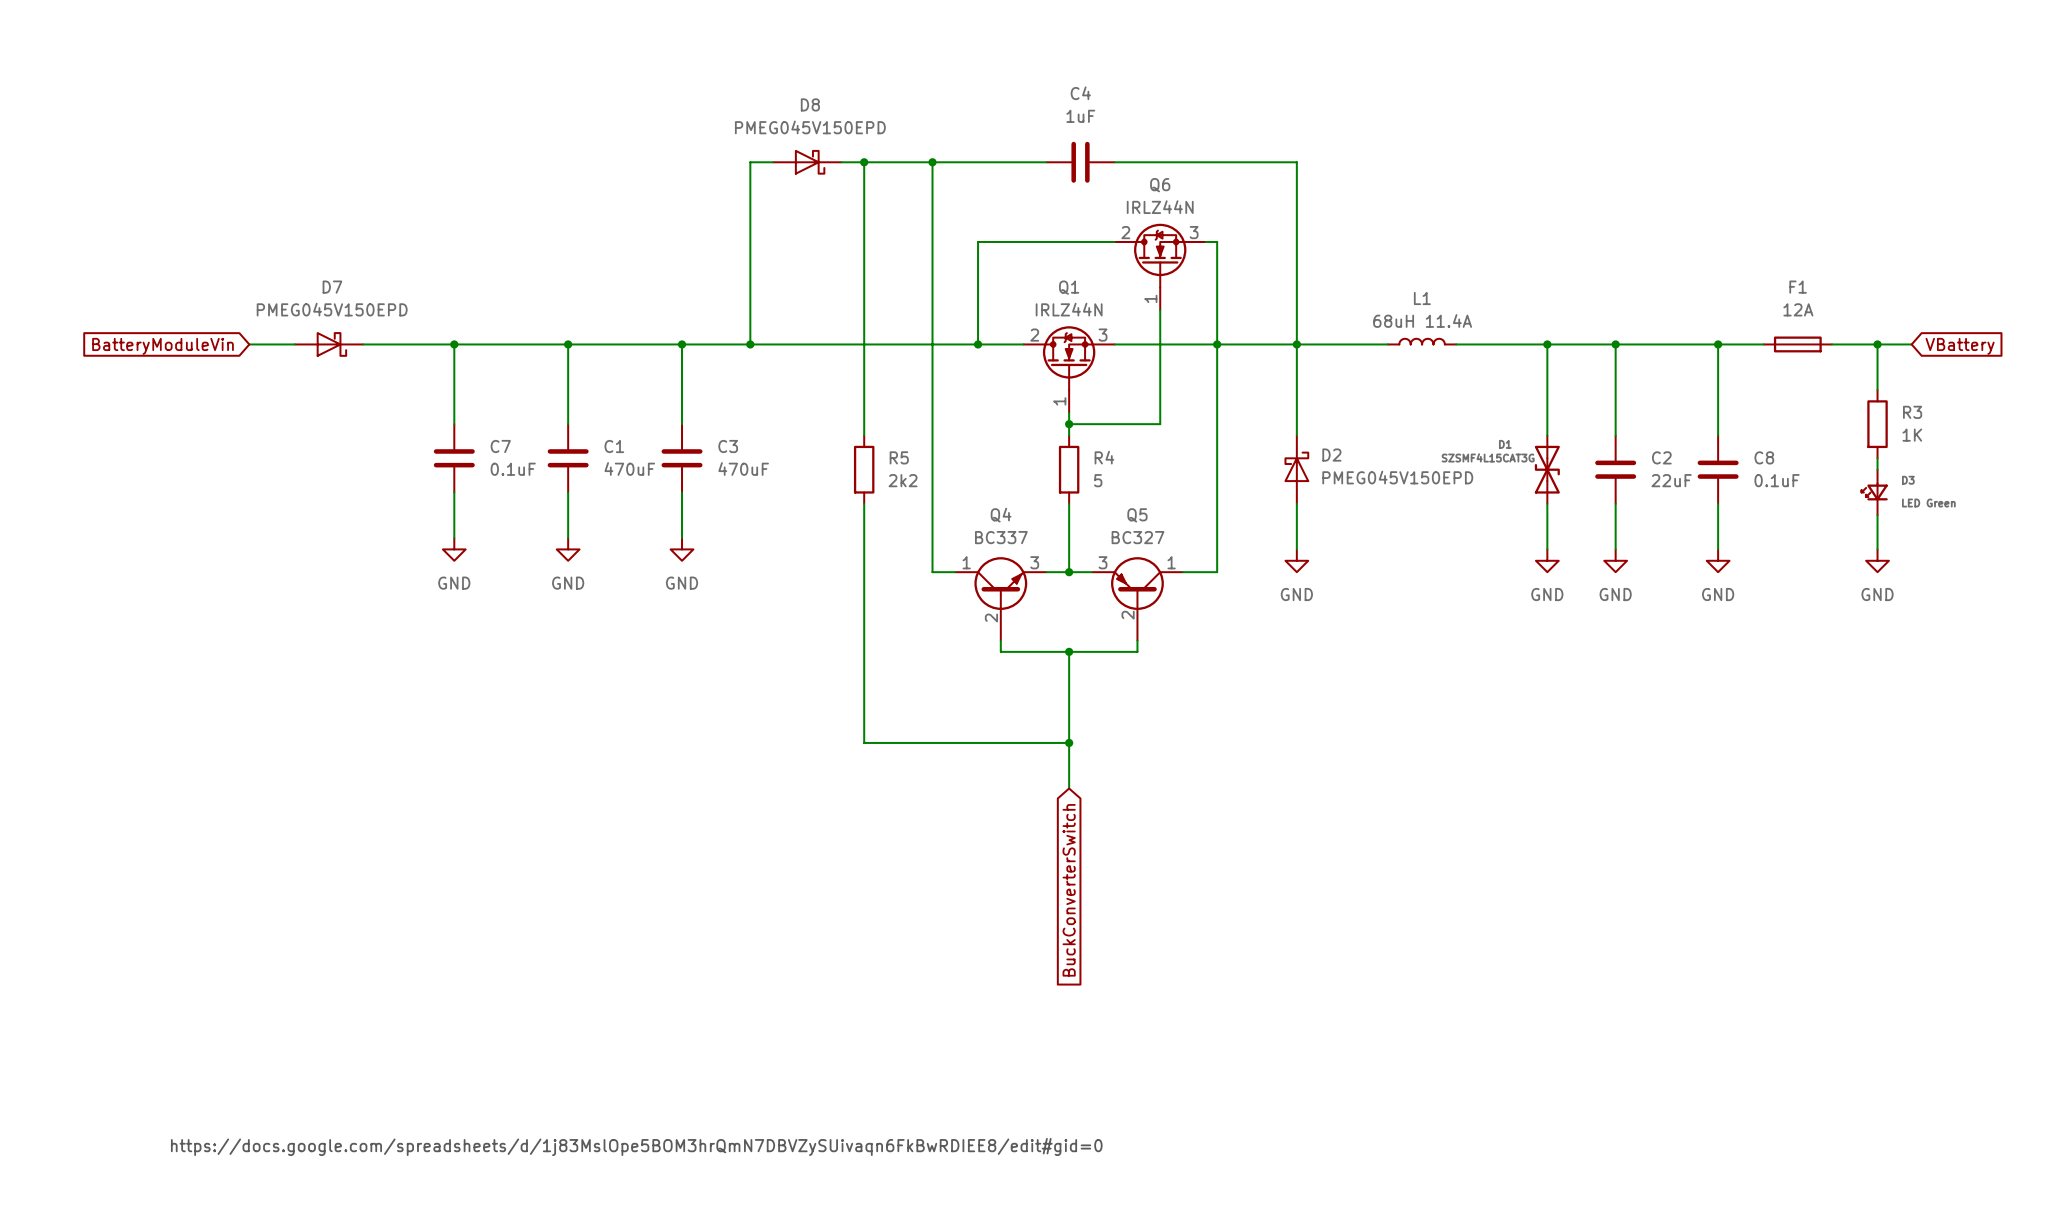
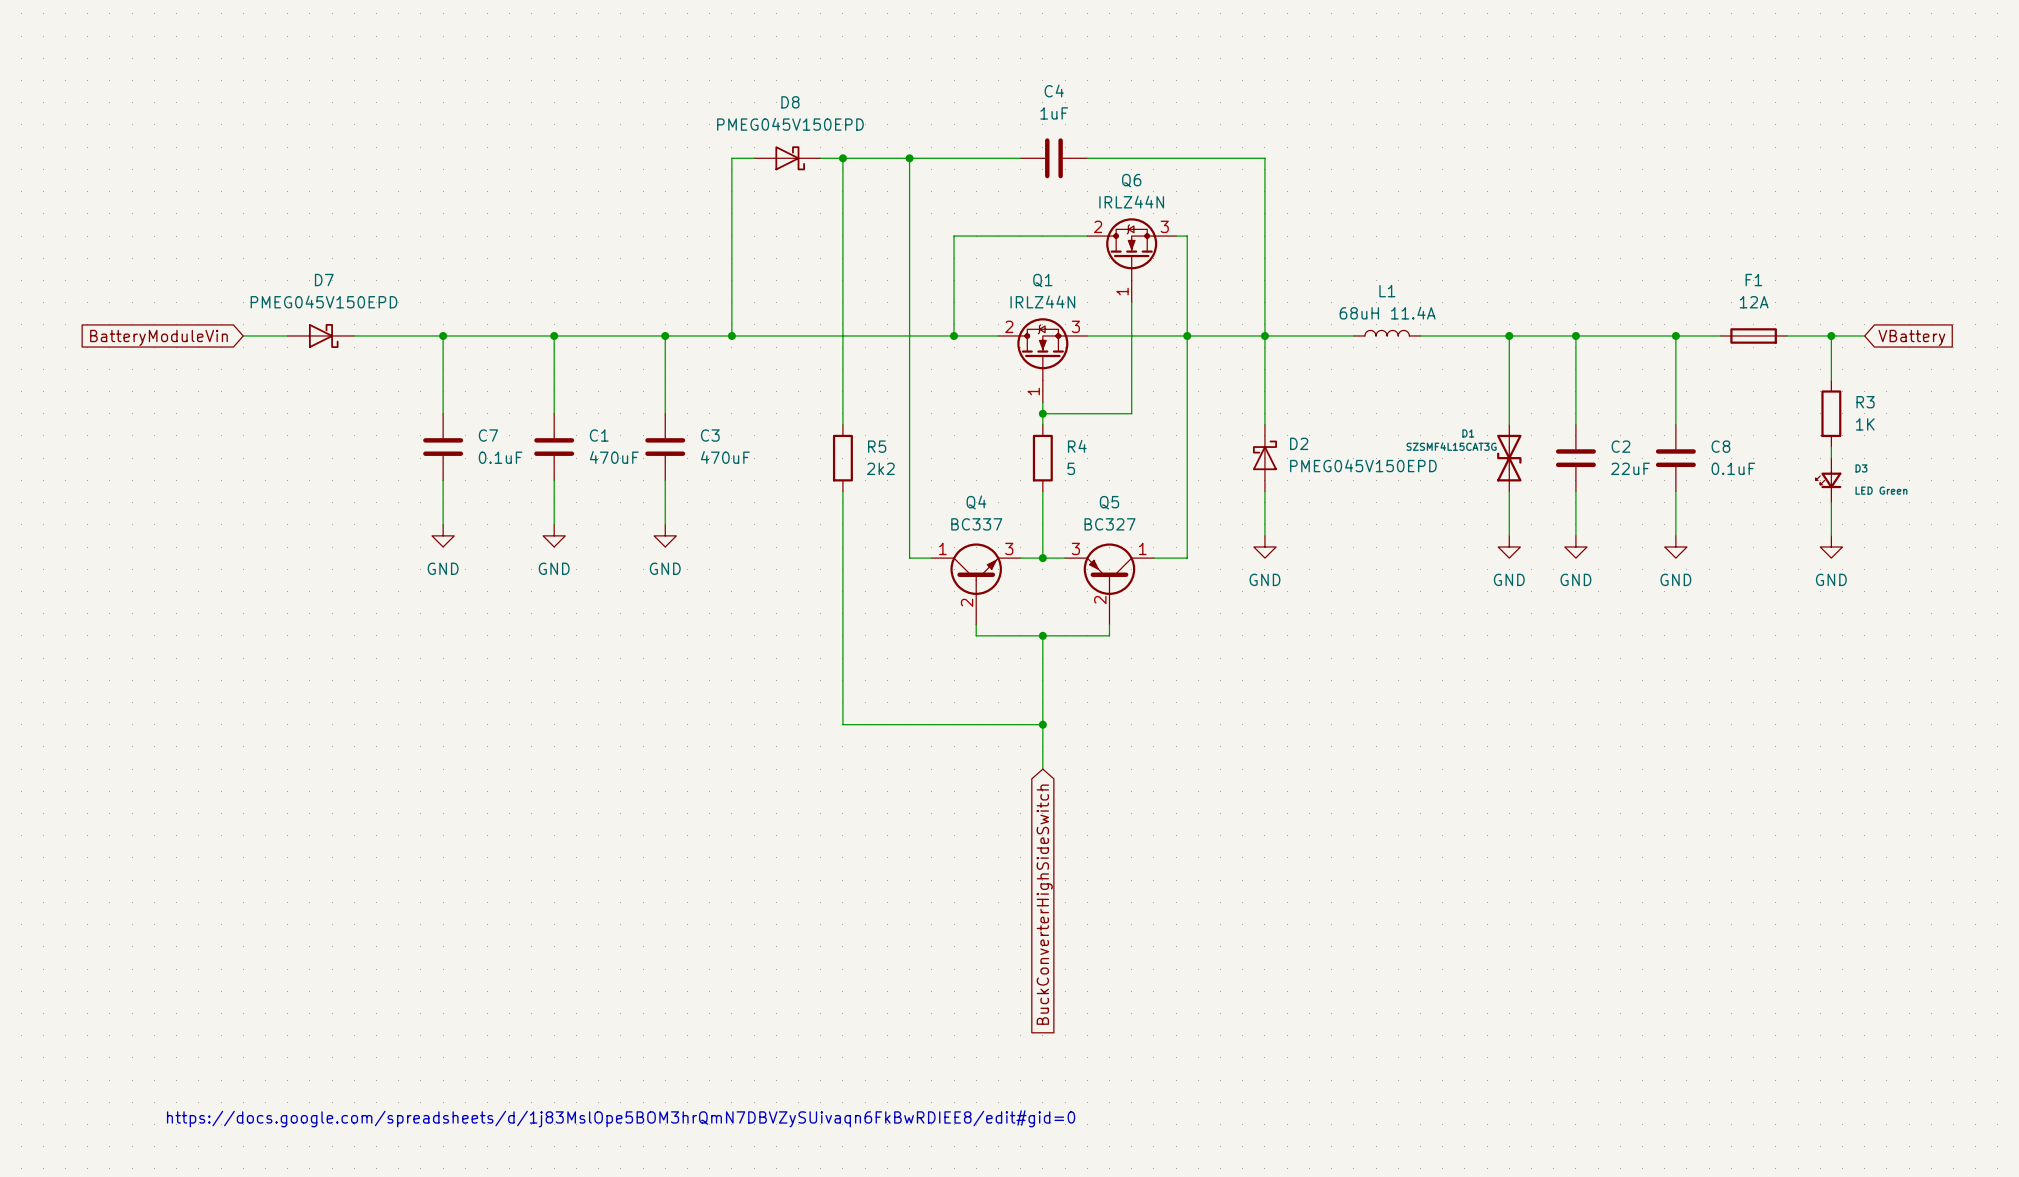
global label: BuckConverterSwitch (1069, 890) -> BuckConverterHighSideSwitch (1044, 904)

